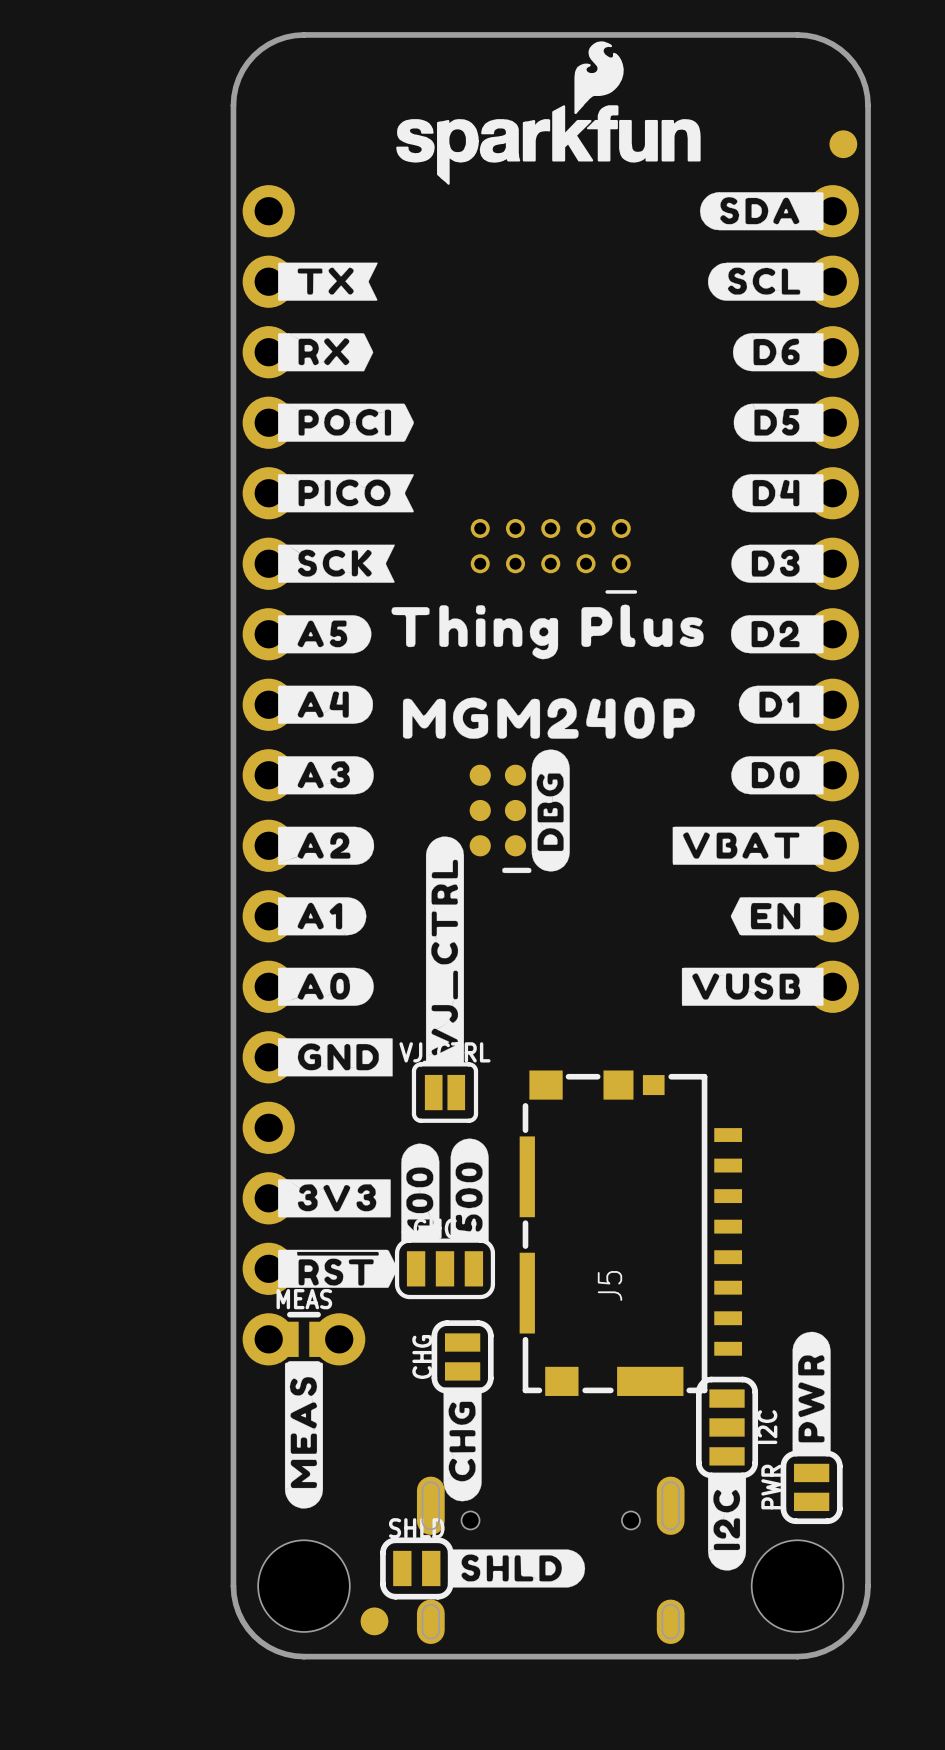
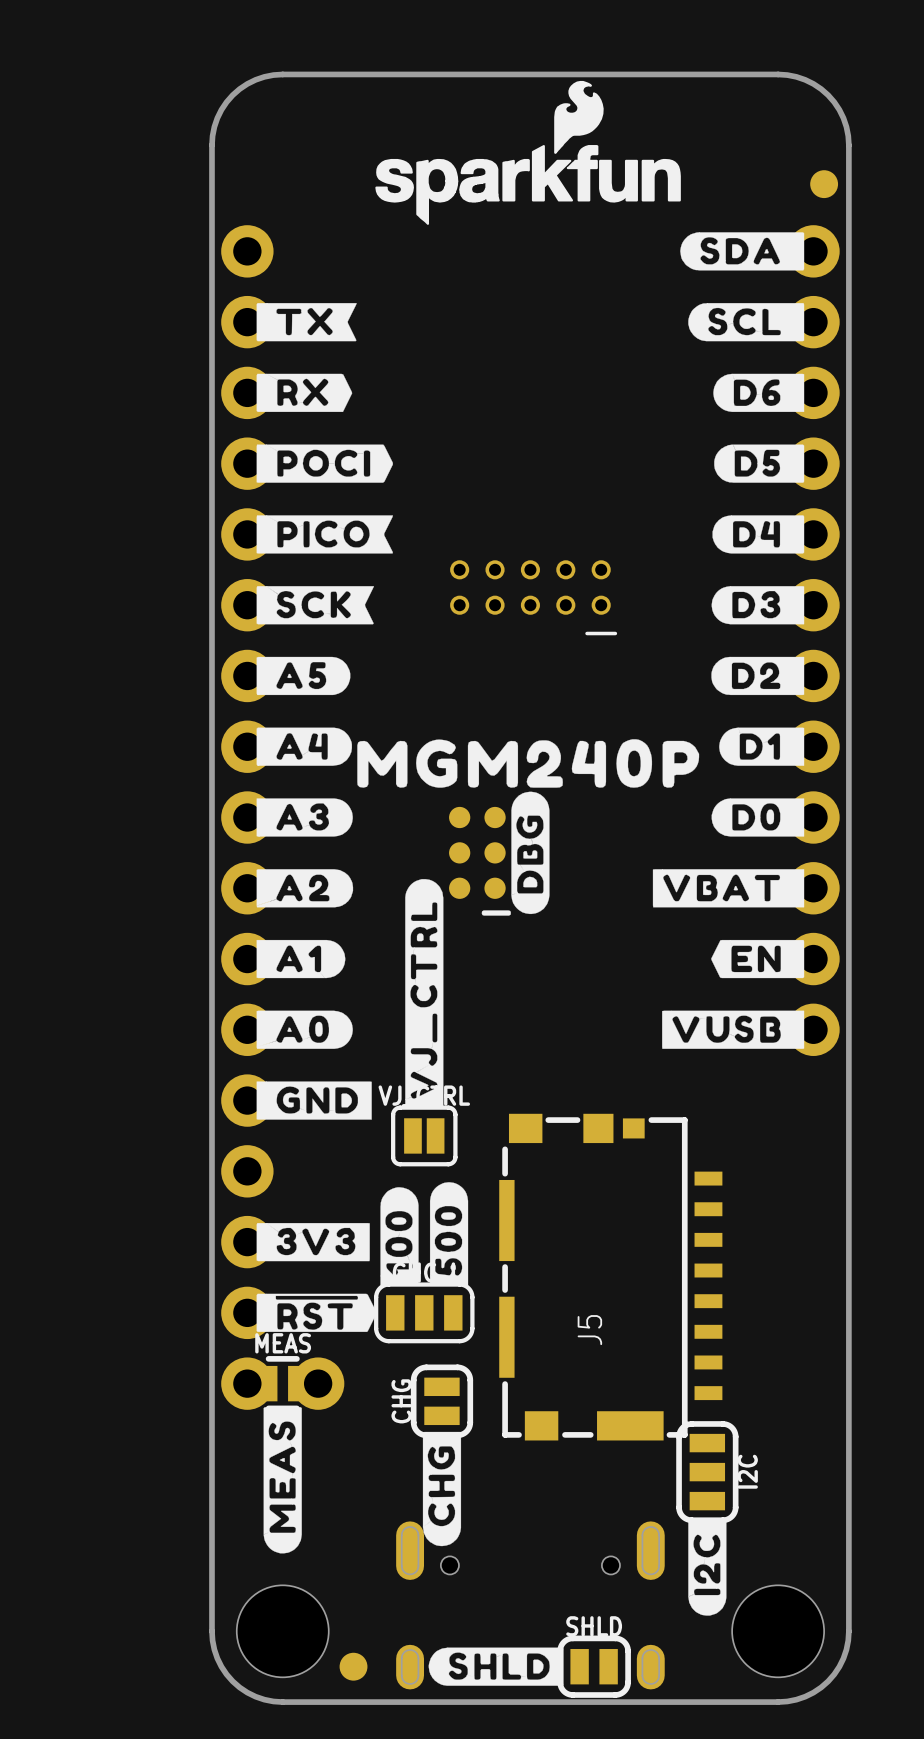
drawing: [391, 604, 704, 660] -> none
drawing shape: [402, 697, 695, 739] -> [357, 739, 700, 788]
drawing: [792, 1331, 831, 1454] -> none
PWR: (811, 1487) -> none
drawing: [450, 1549, 586, 1588] -> none
SHLD position: (416, 1568) -> (594, 1666)
drawing: none -> [428, 1647, 564, 1686]

